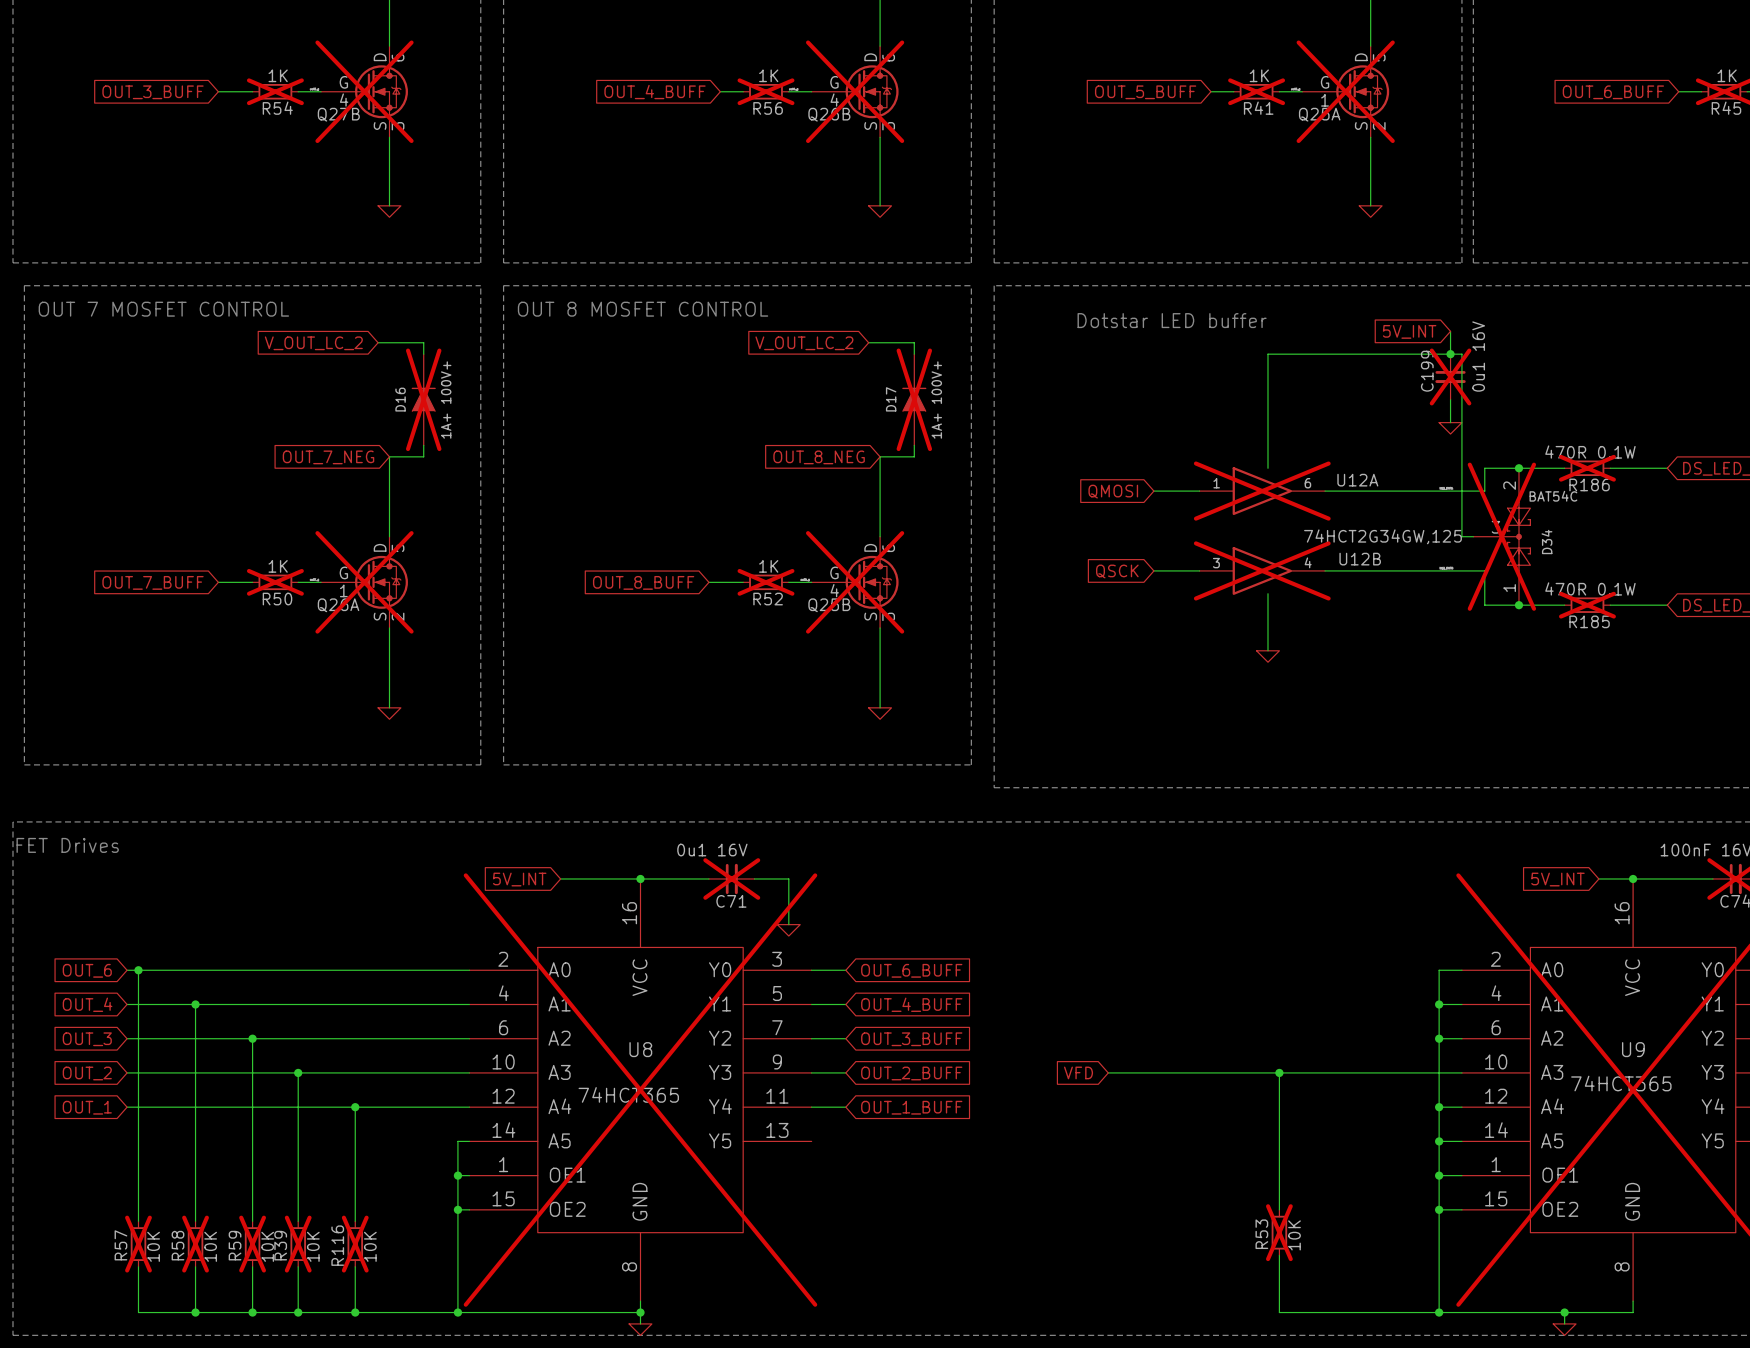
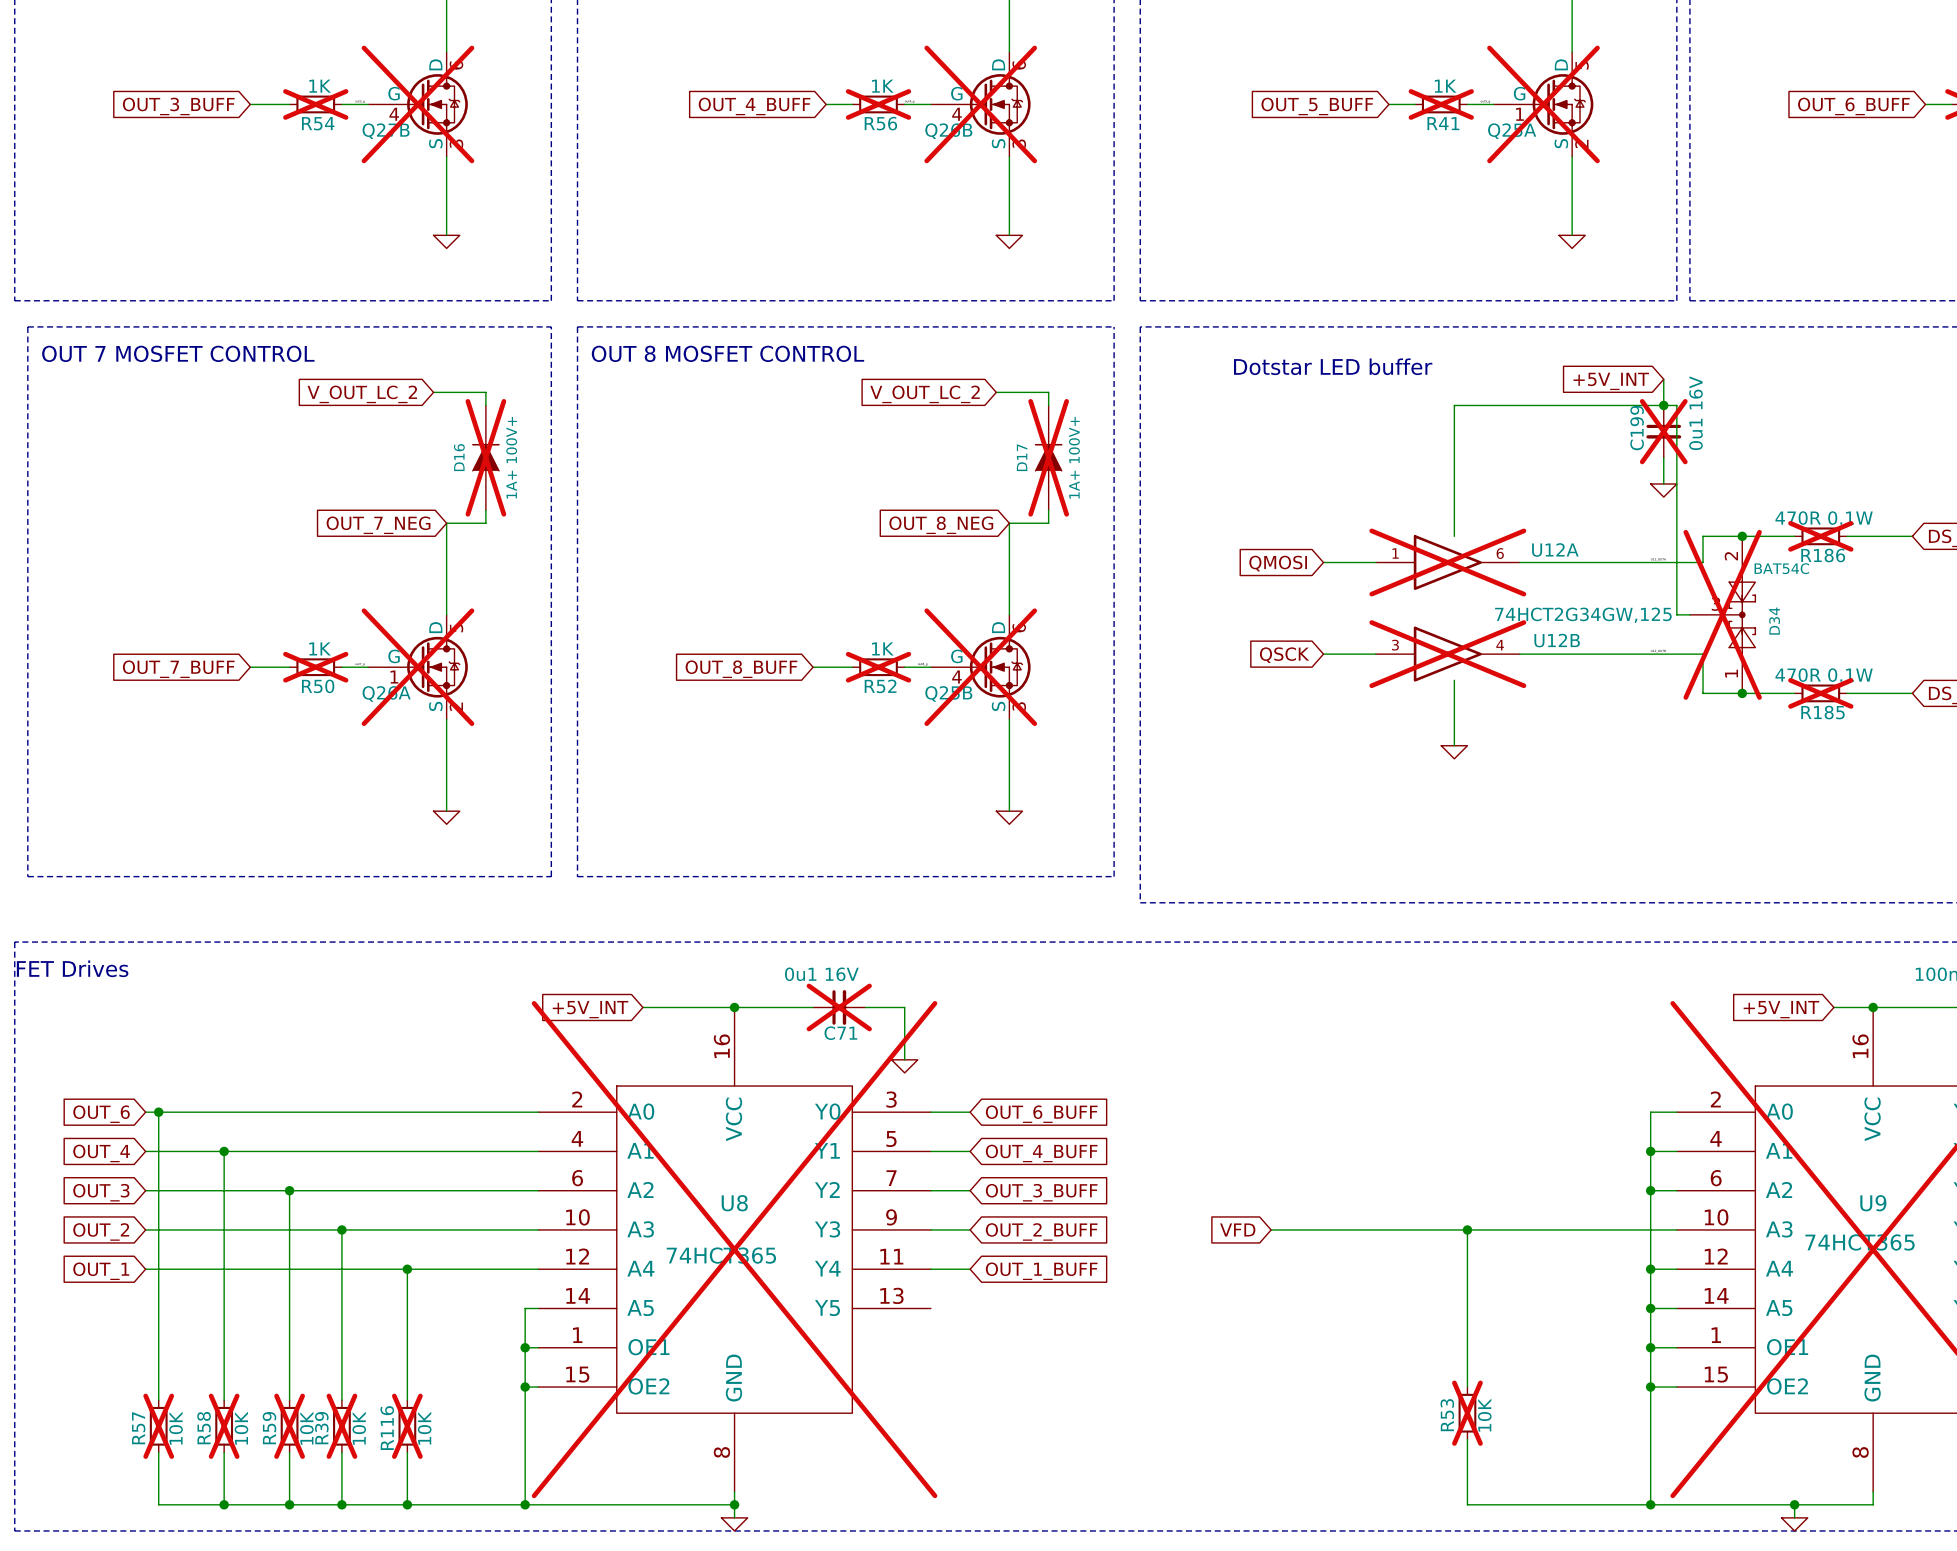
global label: 5V_INT (1409, 331) -> +5V_INT (1611, 381)
global label: 5V_INT (519, 879) -> +5V_INT (590, 1009)
global label: 5V_INT (1557, 879) -> +5V_INT (1781, 1009)

